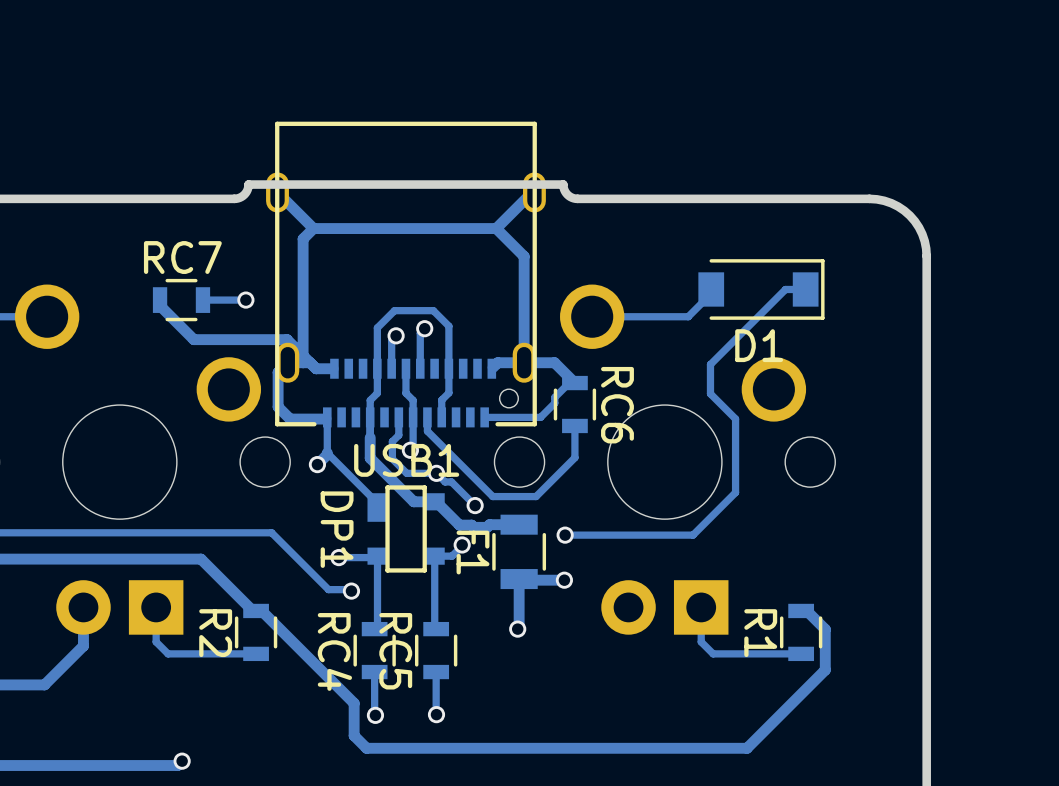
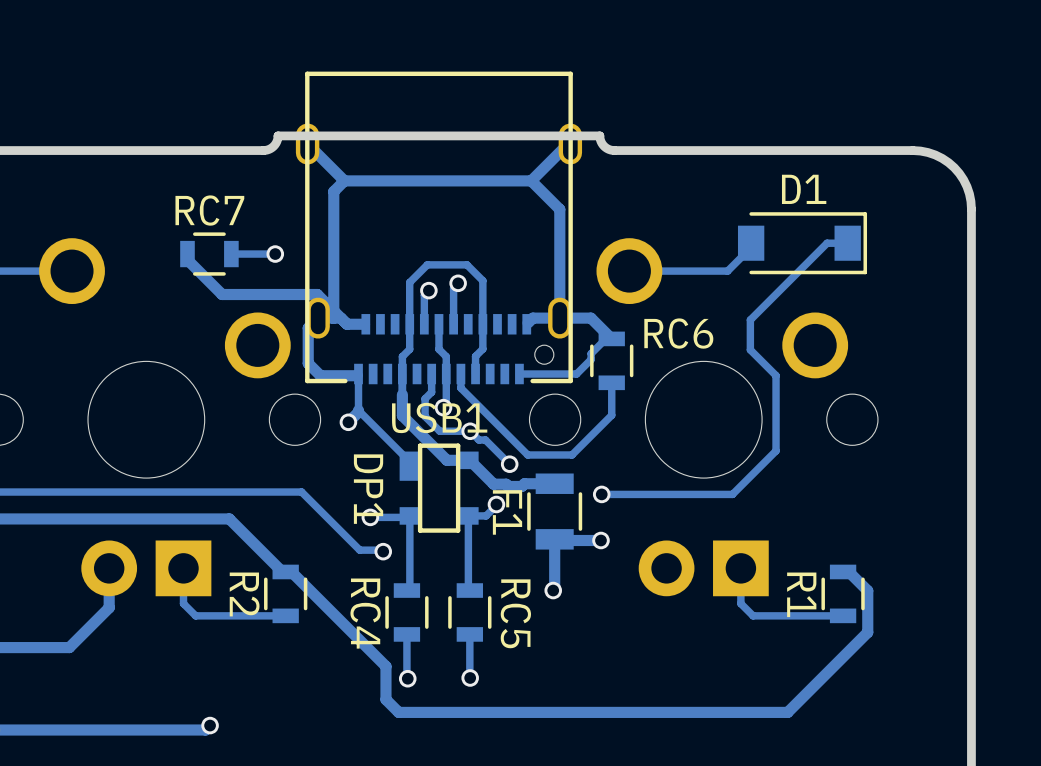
D1 name position: D1 (759, 345) -> D1 (804, 189)
RC6 name rotation: 0° (617, 405) -> 90° counterclockwise (678, 333)
RC5 name position: RC5 (395, 651) -> RC5 (515, 613)

